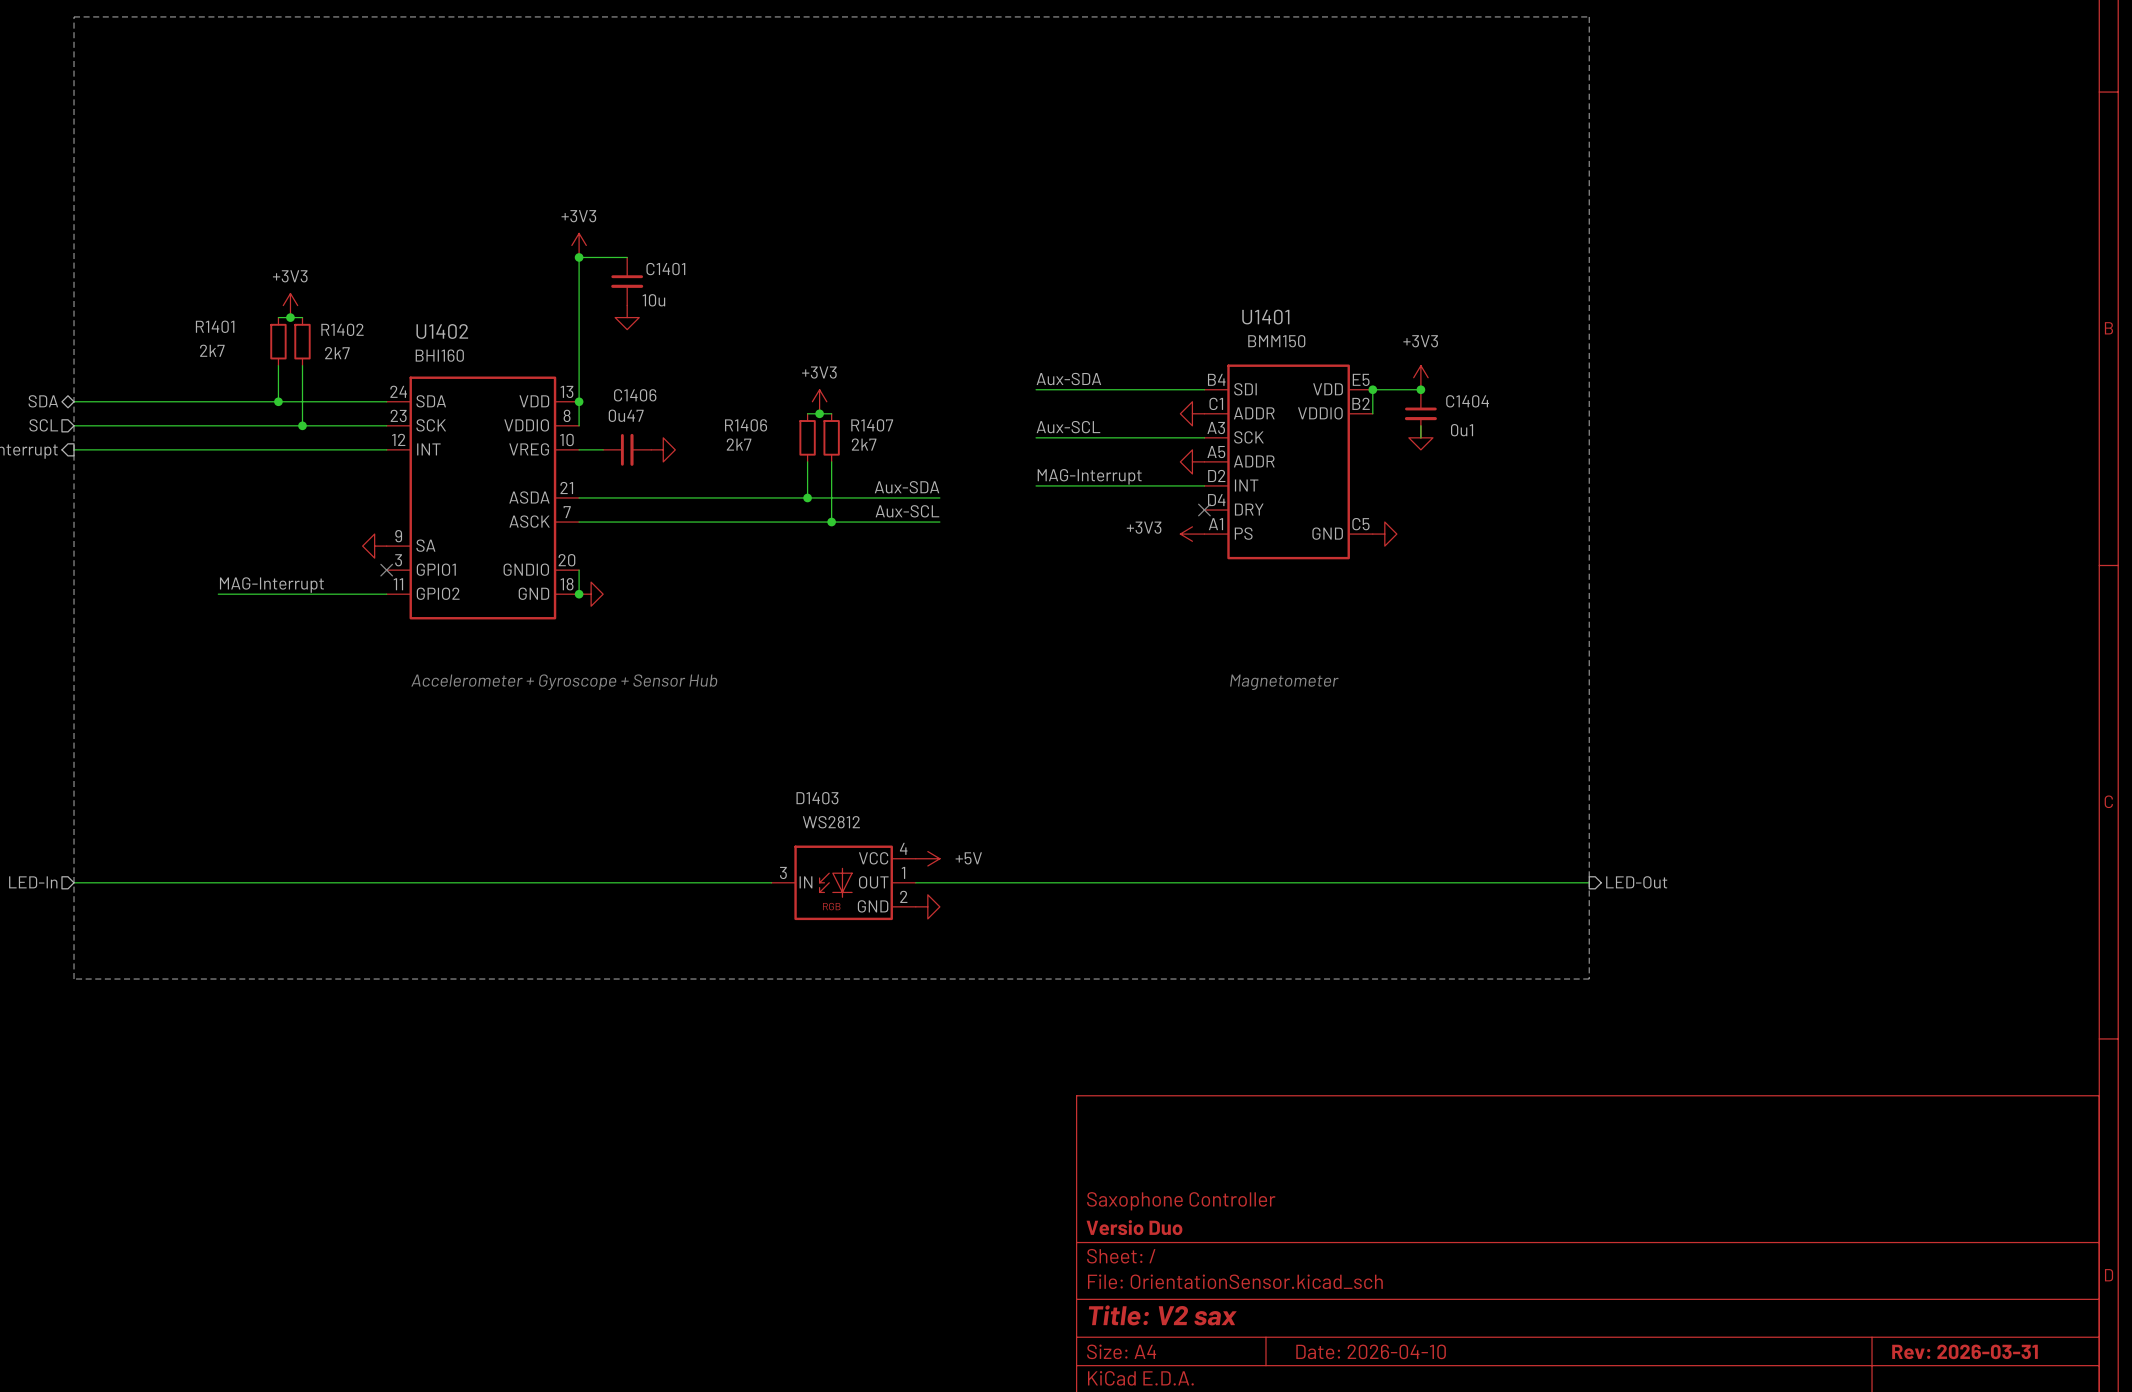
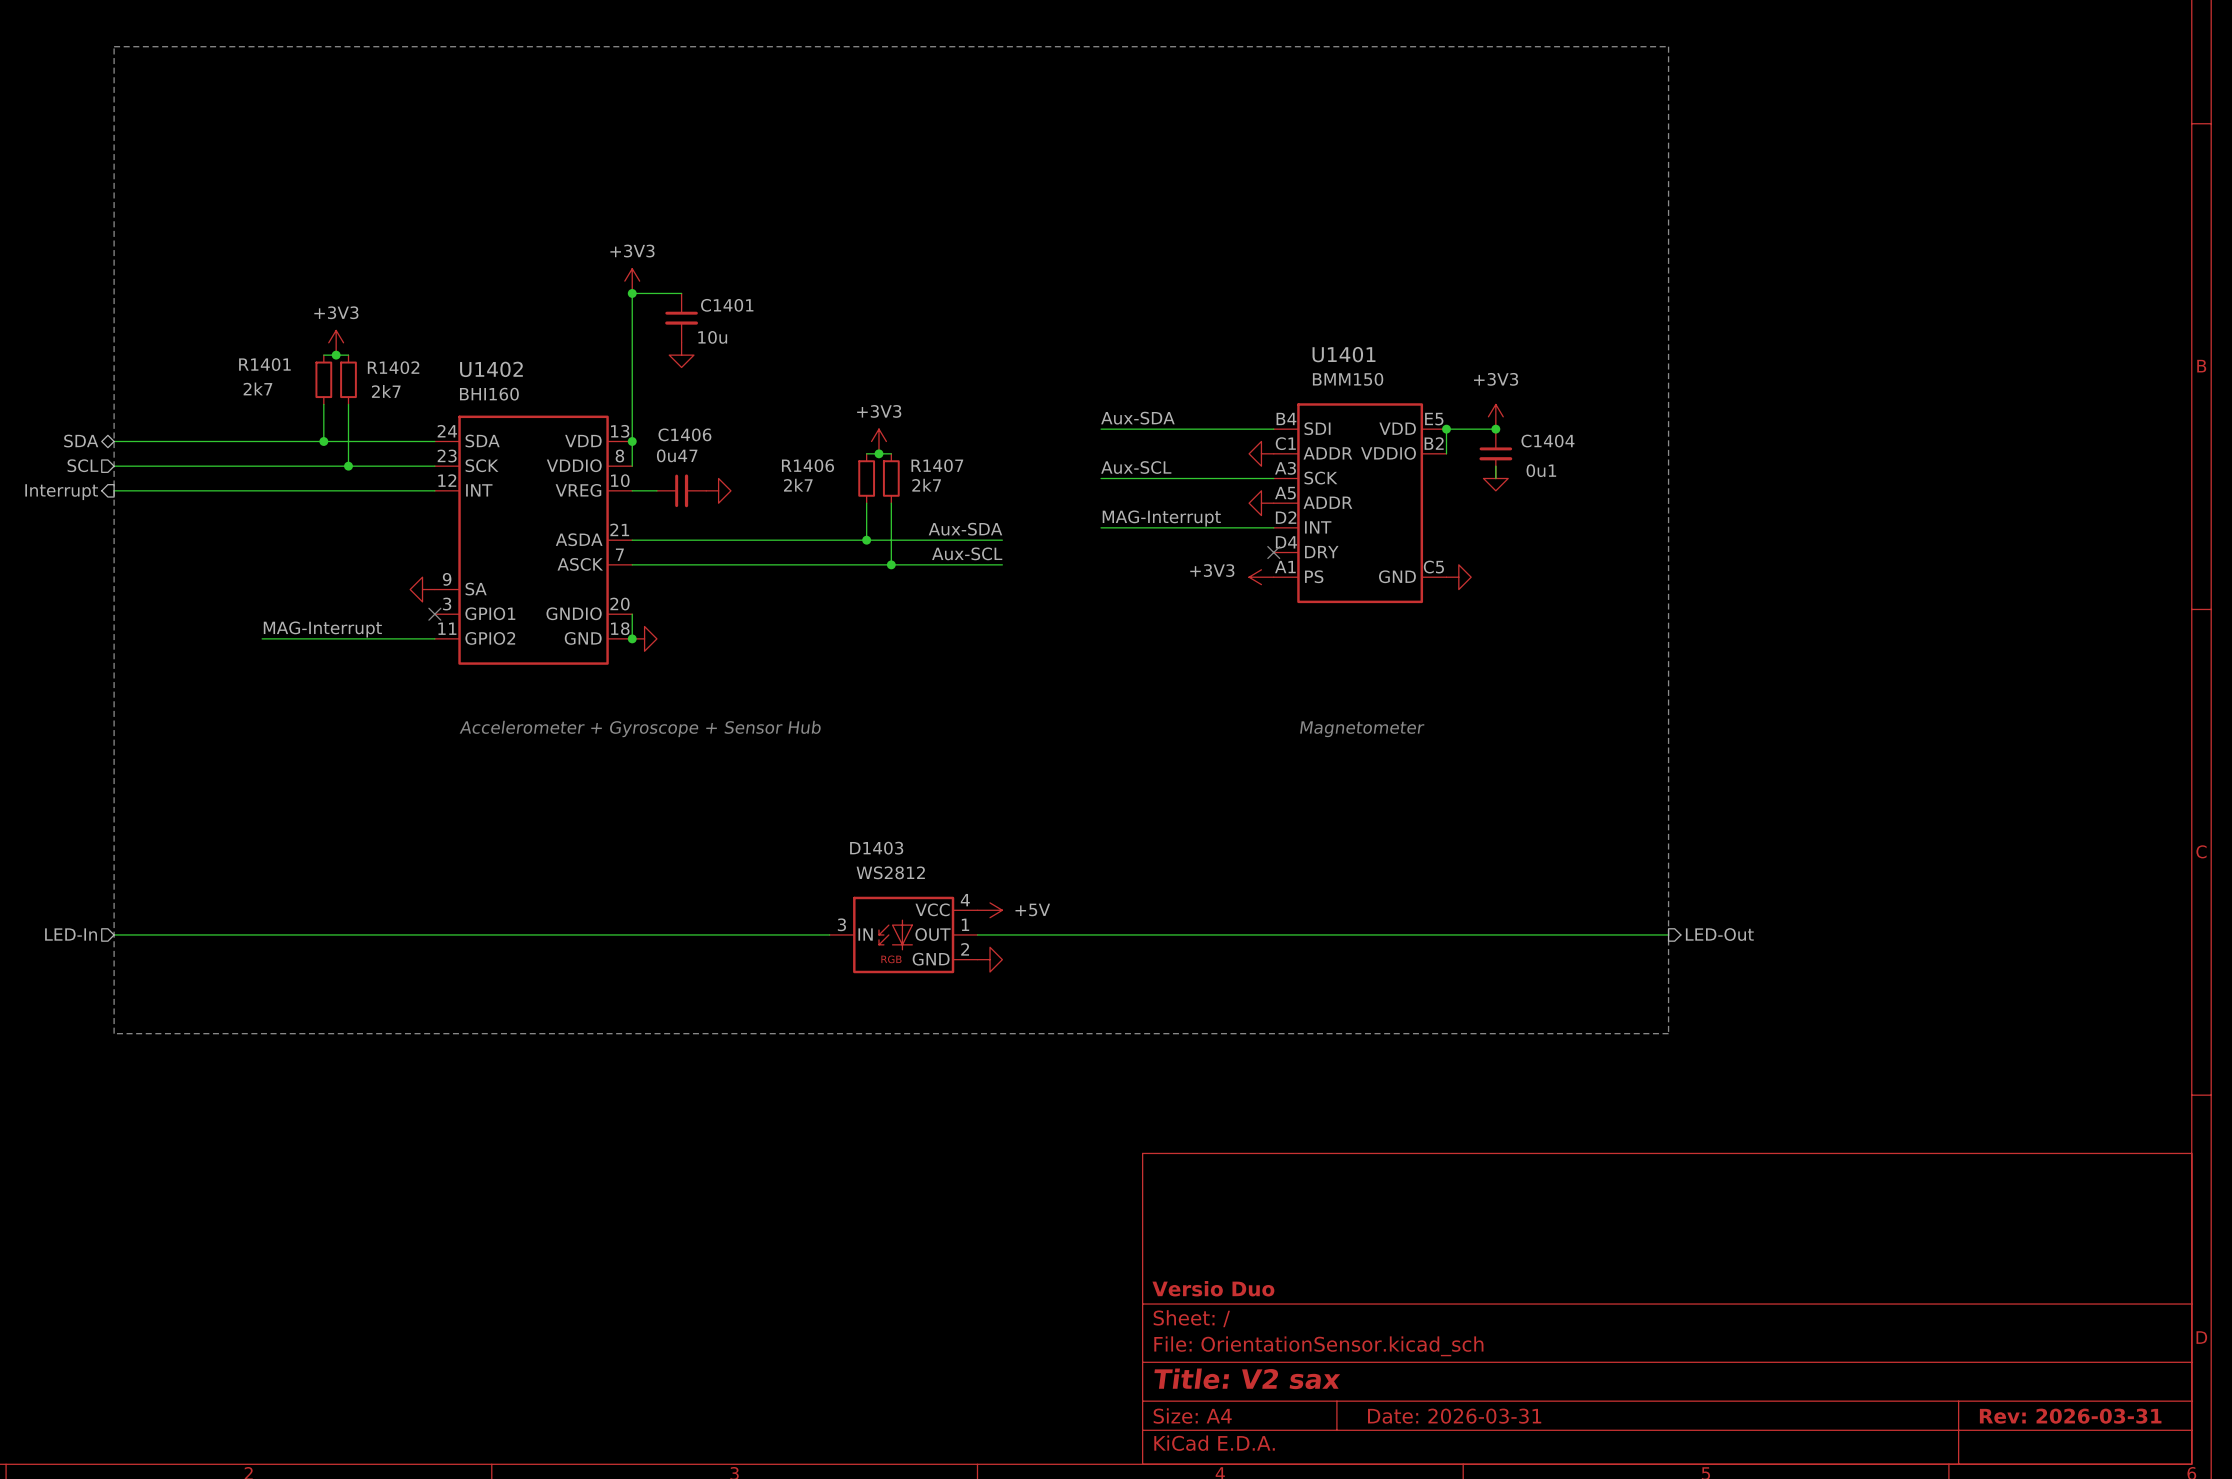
title block: Saxophone Controller (1181, 1201) -> none
title block: Date: 2026-04-10 (1371, 1351) -> Date: 2026-03-31 (1454, 1416)

